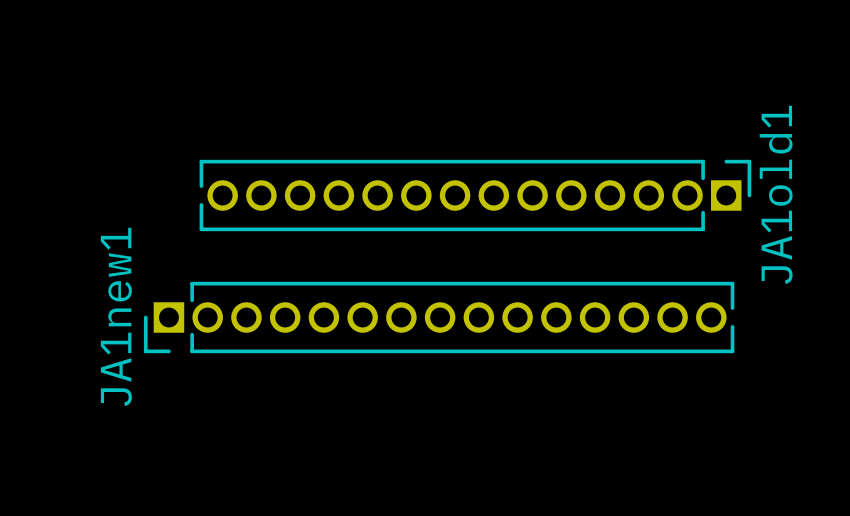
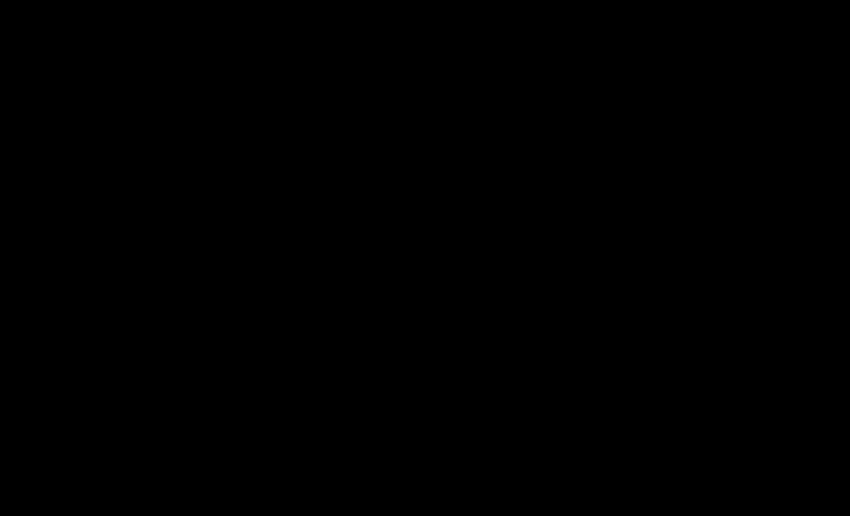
JA1old1: (475, 195) -> none
JA1new1: (439, 317) -> none

